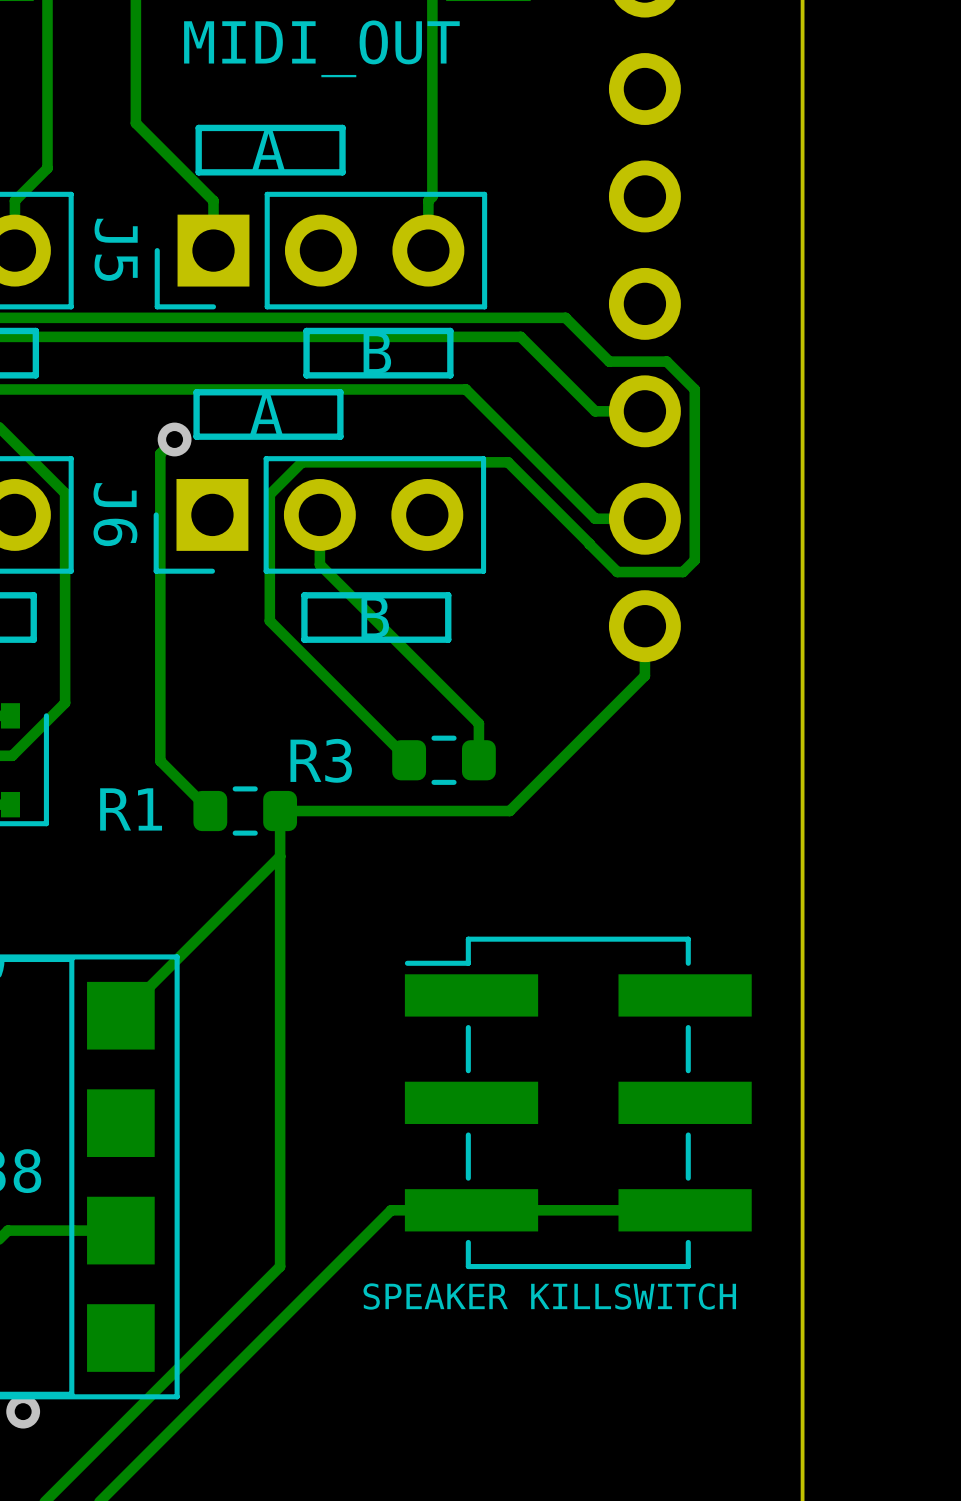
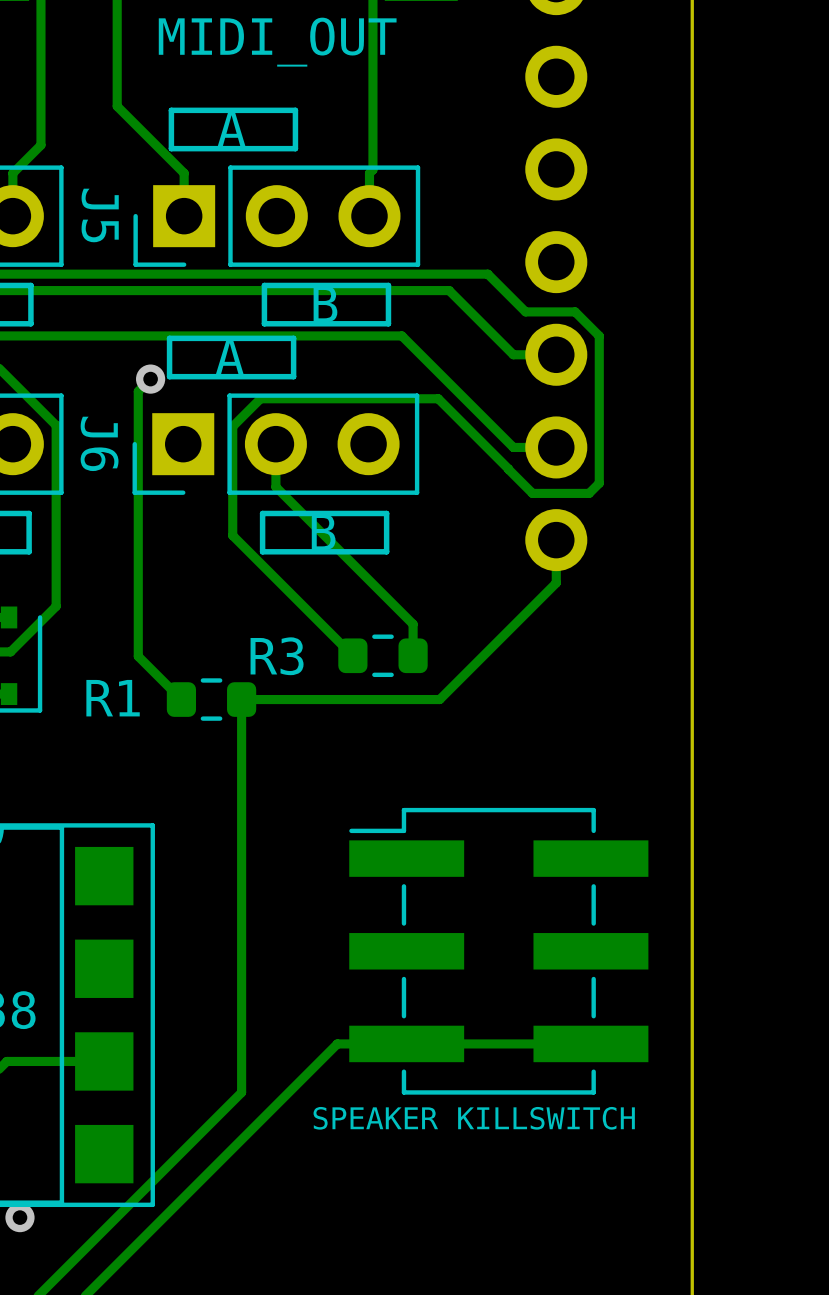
track: (280, 856) (120, 1015) -> none

